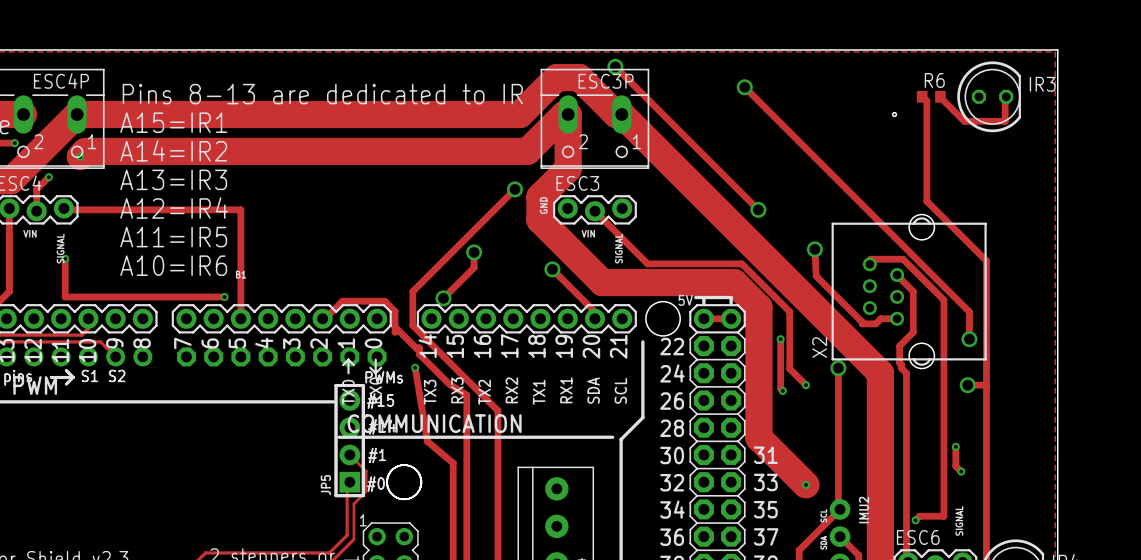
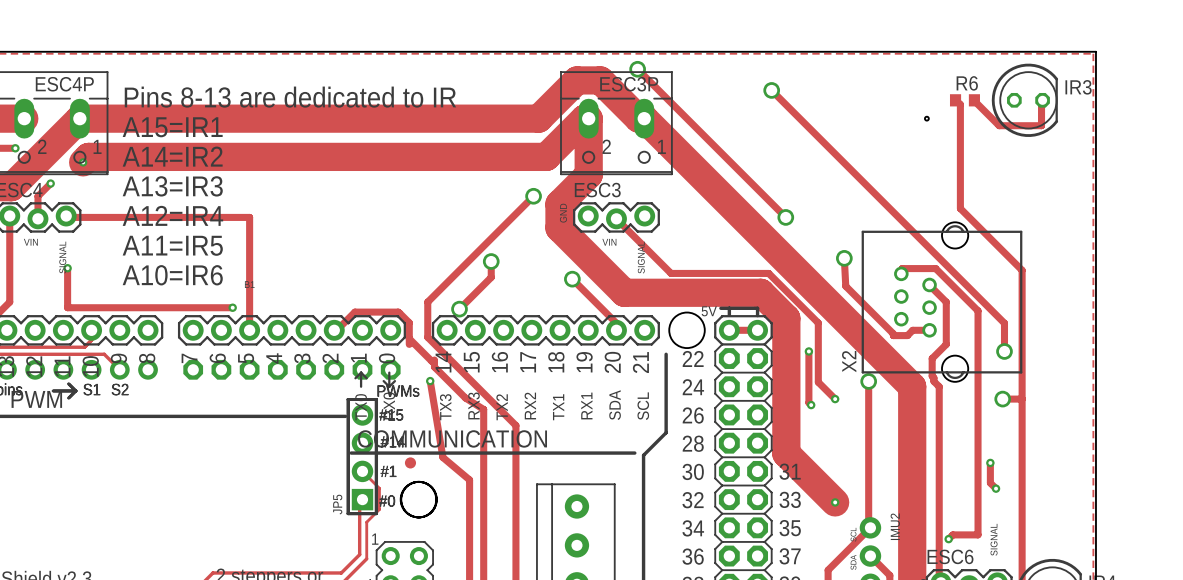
part: none -> (410, 462)

